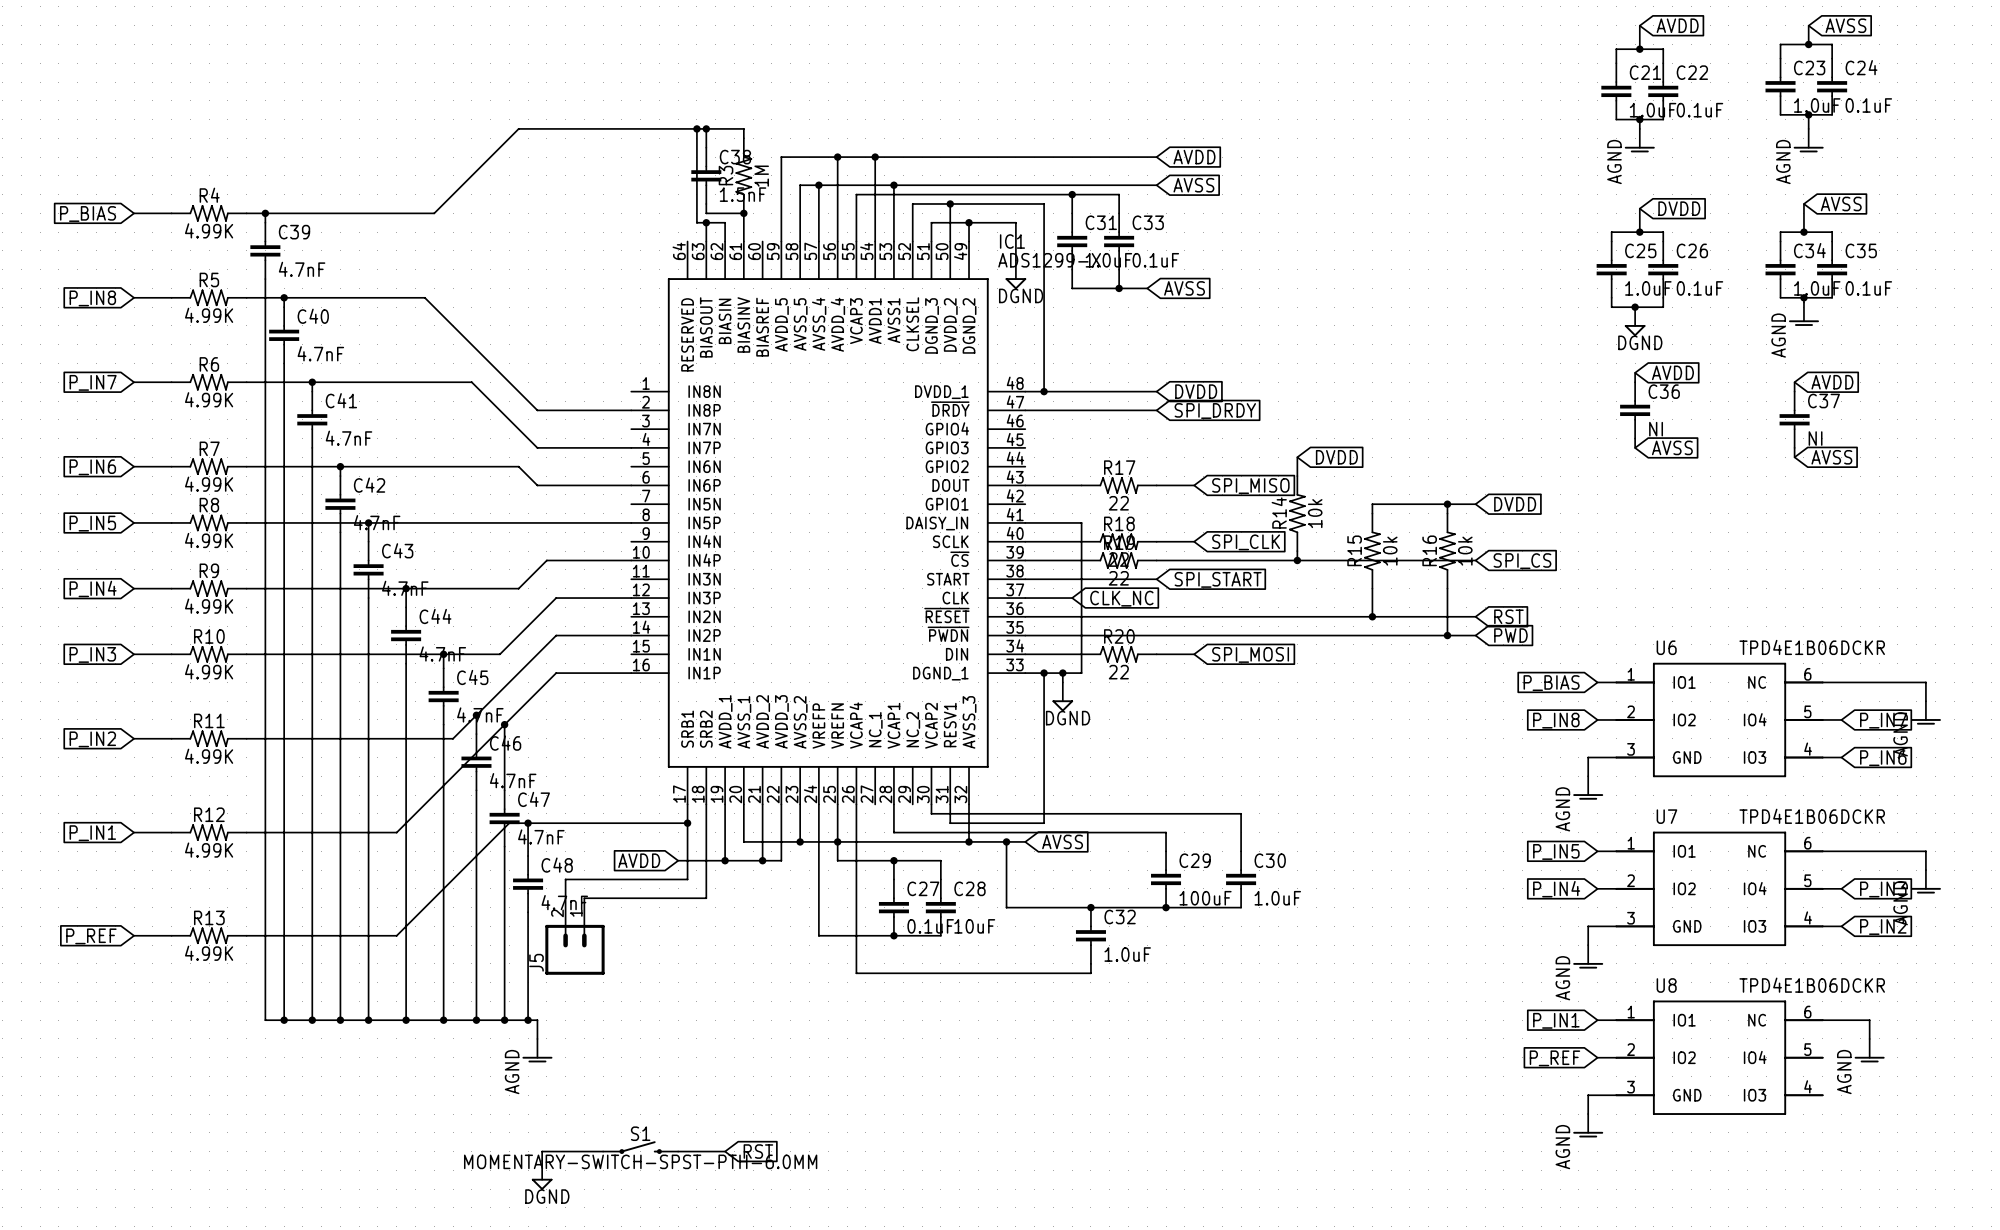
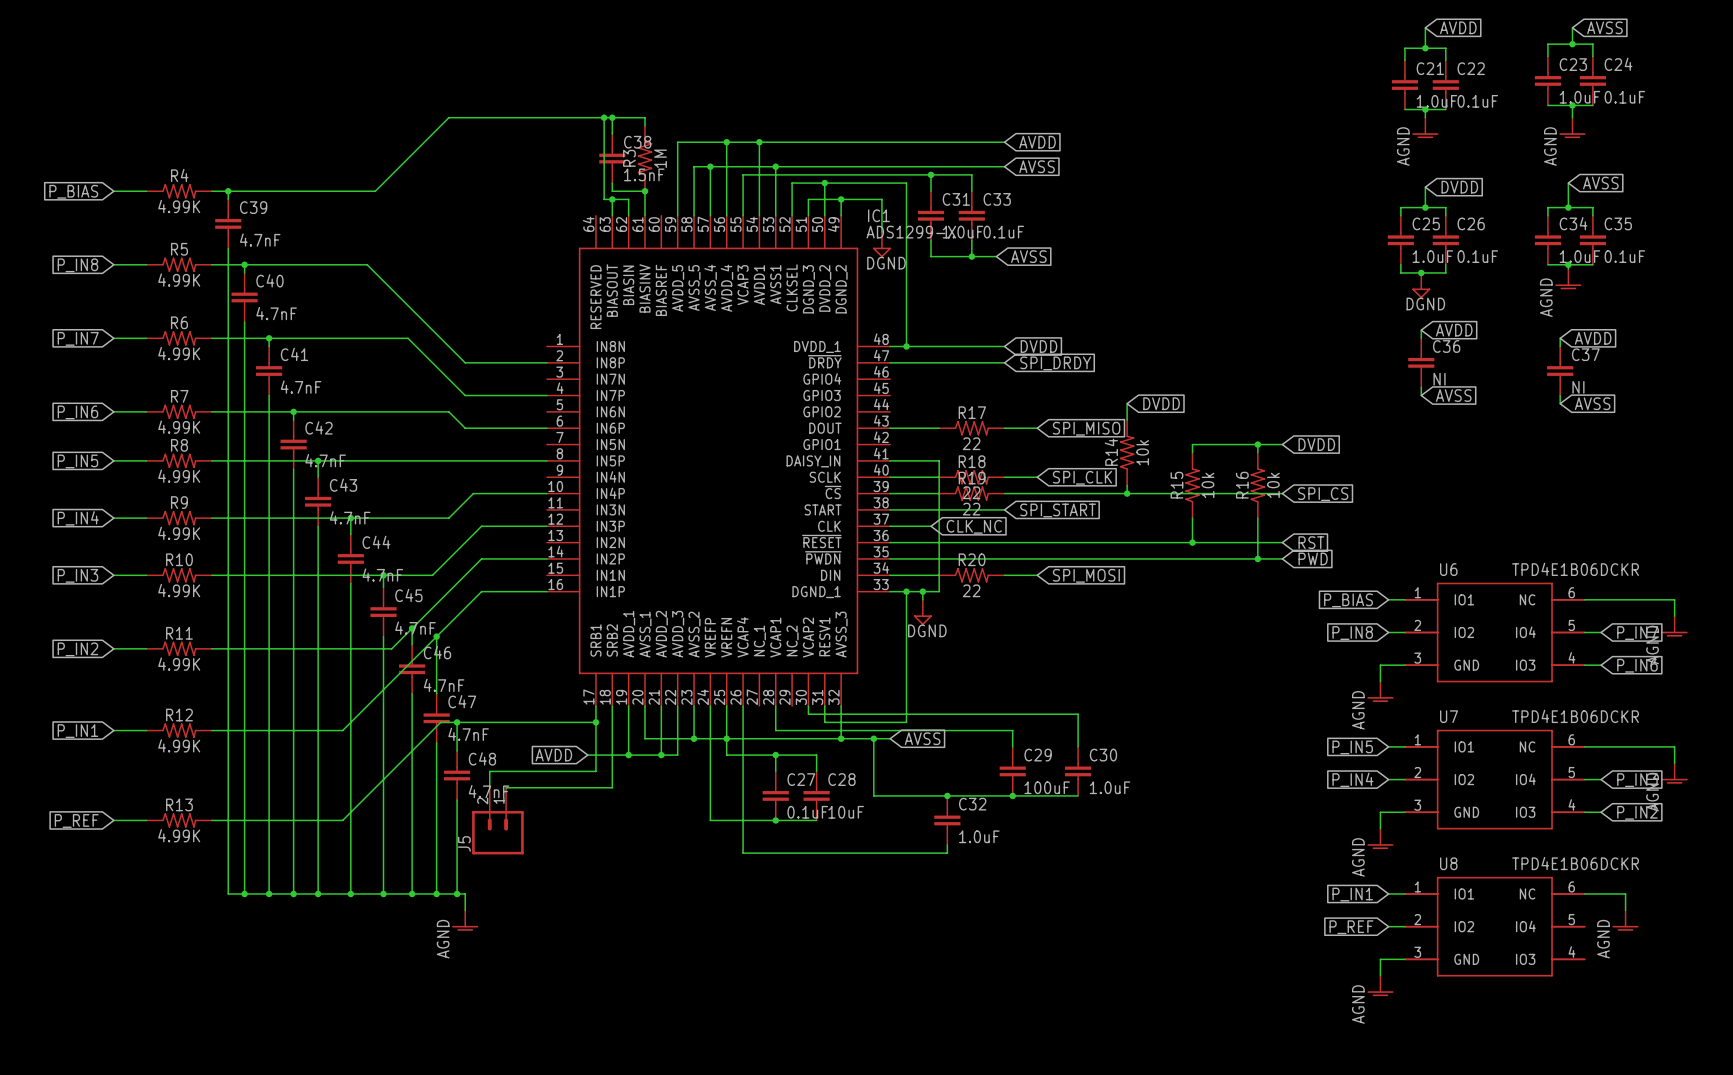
S1: MOMENTARY-SWITCH-SPST-PTH-6.0MM (640, 1147) -> none
wire: (603, 1151) (542, 1151) (542, 1160) -> none
wire: (678, 1151) (725, 1151) -> none
global label: RST (758, 1151) -> none
power symbol: DGND (542, 1175) -> none

